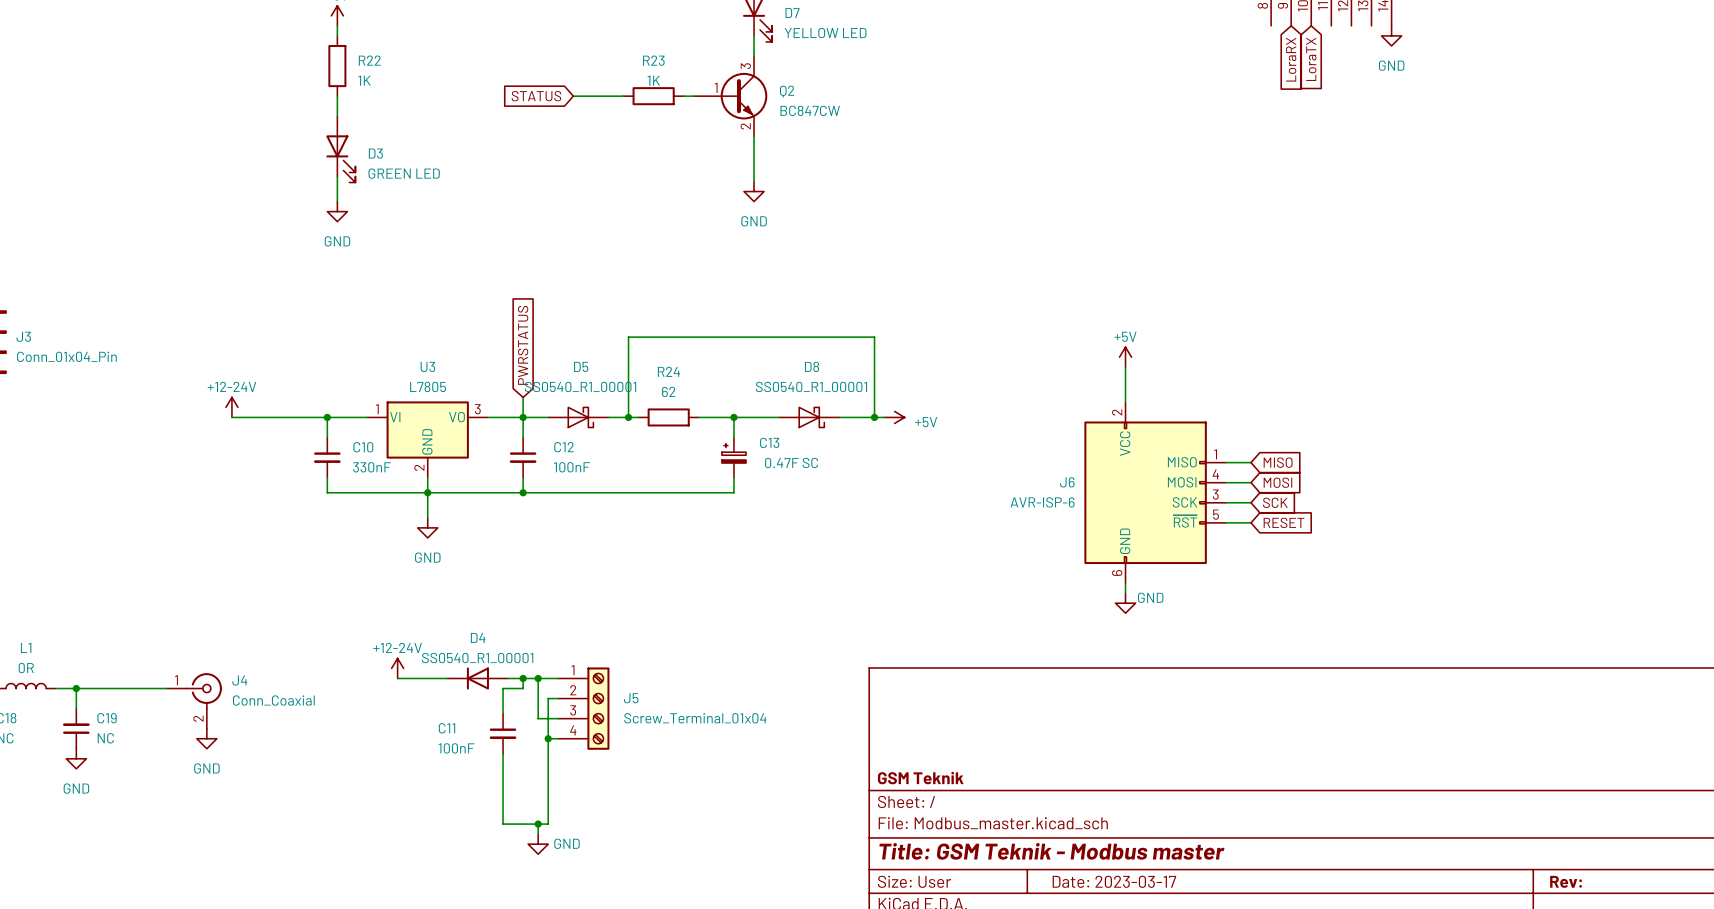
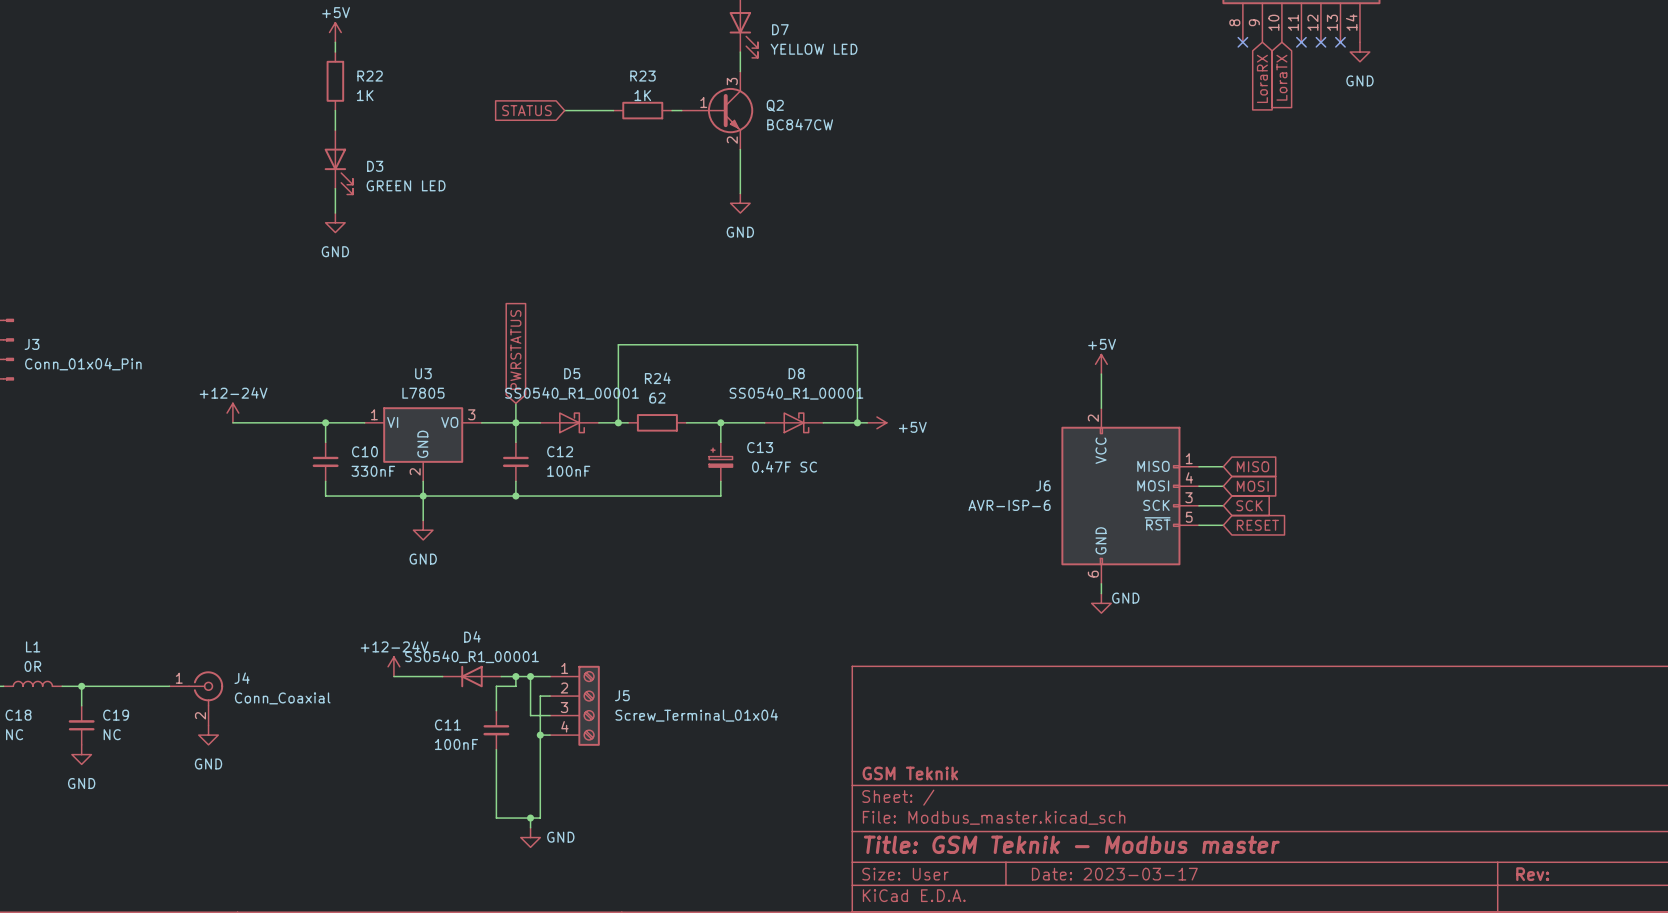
no-connect mark: none -> (1242, 42)
no-connect mark: none -> (1301, 42)
no-connect mark: none -> (1320, 42)
no-connect mark: none -> (1340, 42)

